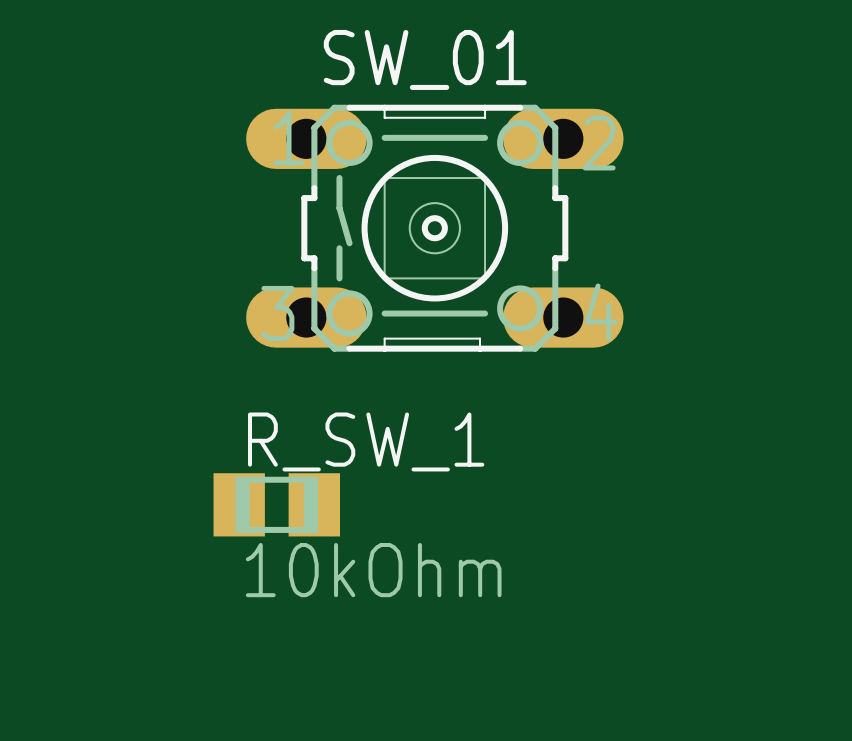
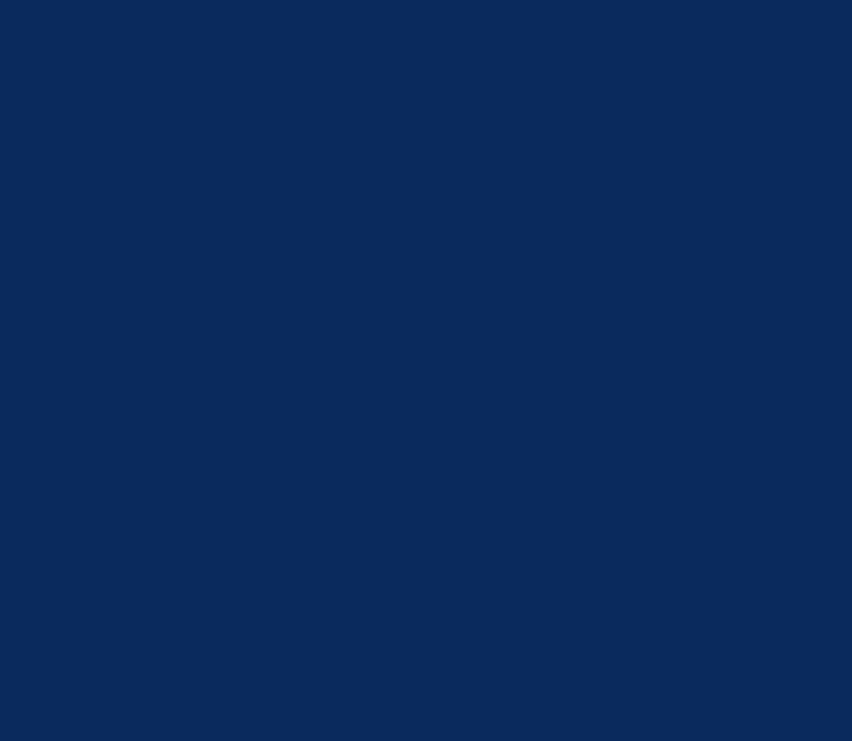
SW_01: (434, 228) -> none
R_SW_1: 10kOhm (276, 504) -> none

